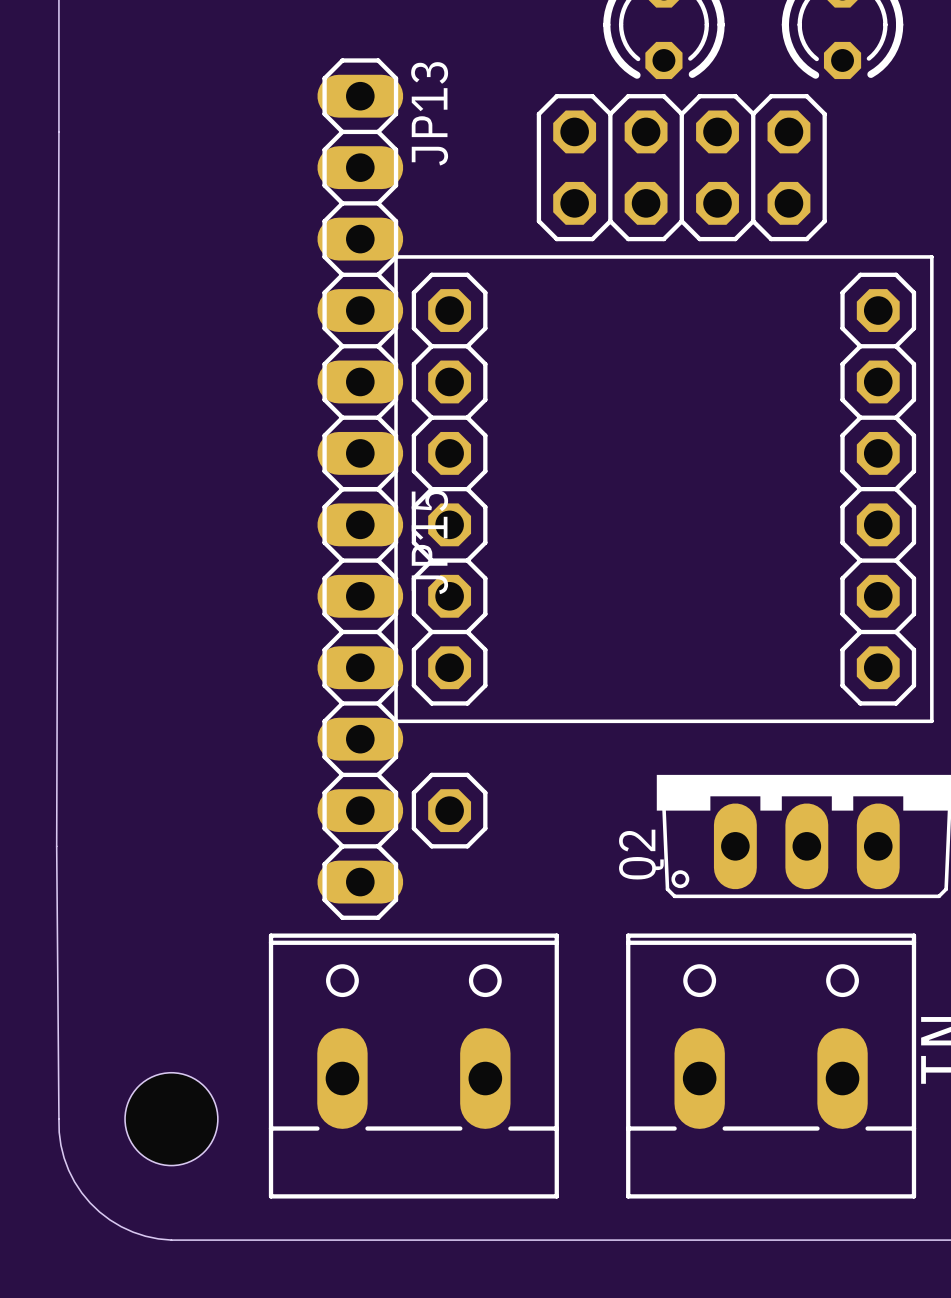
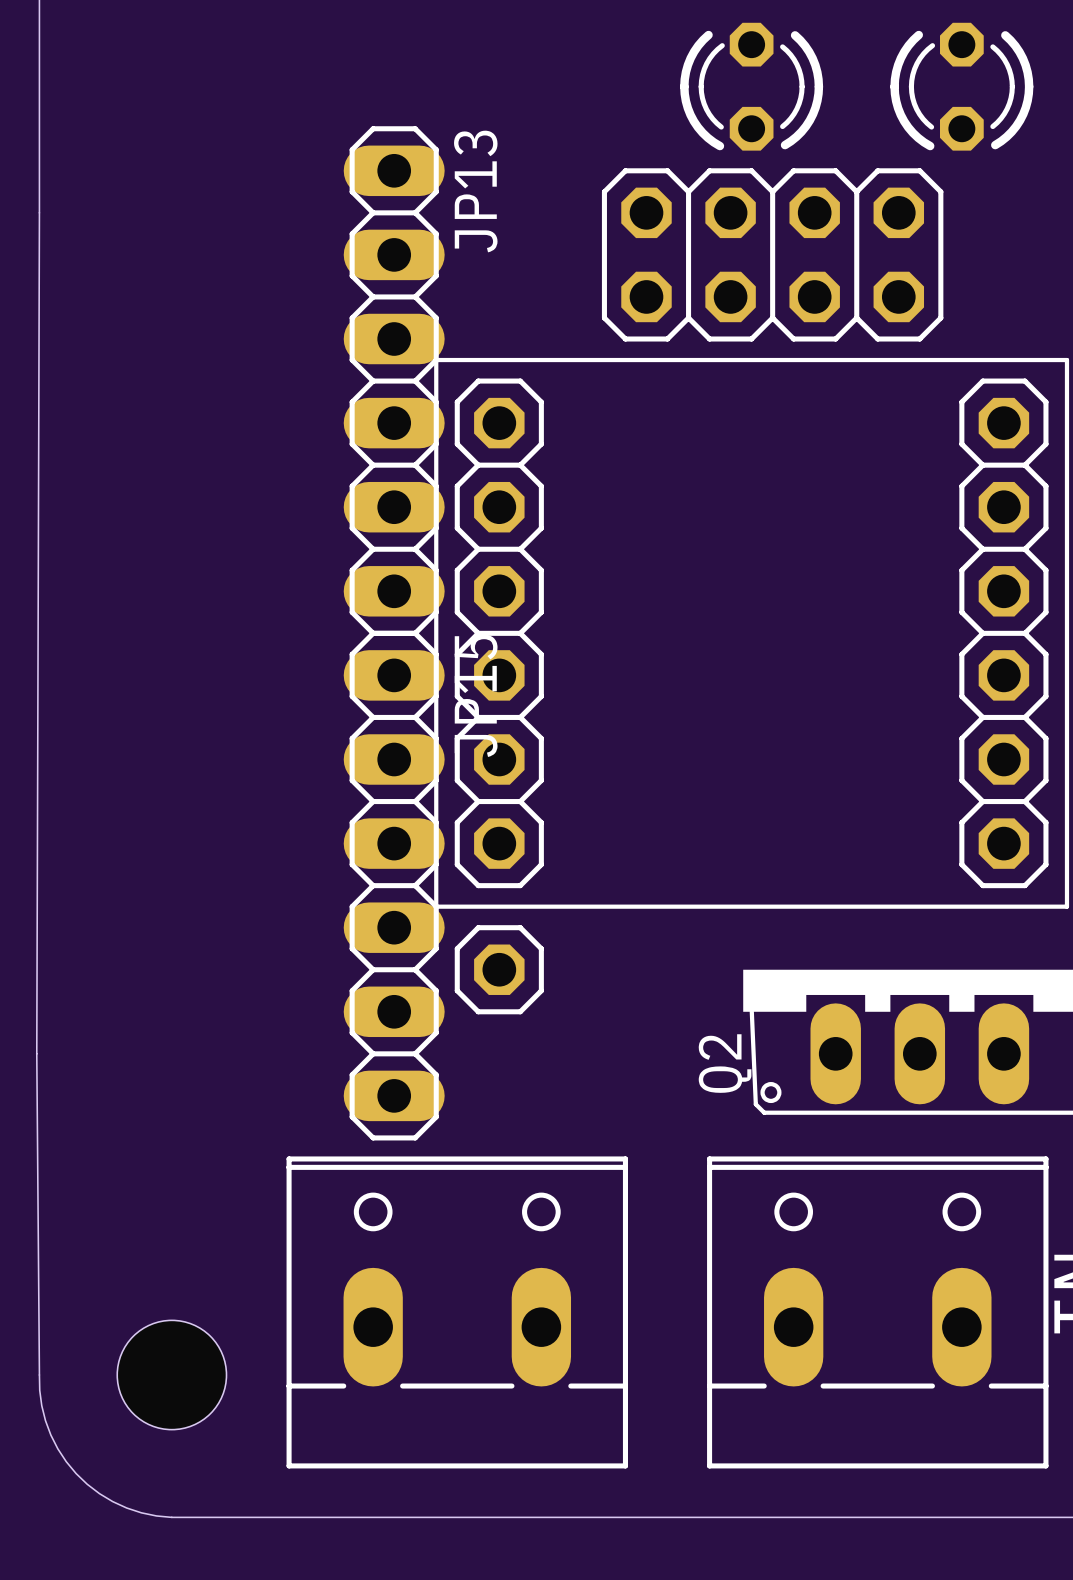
part position: (449, 810) -> (499, 969)

